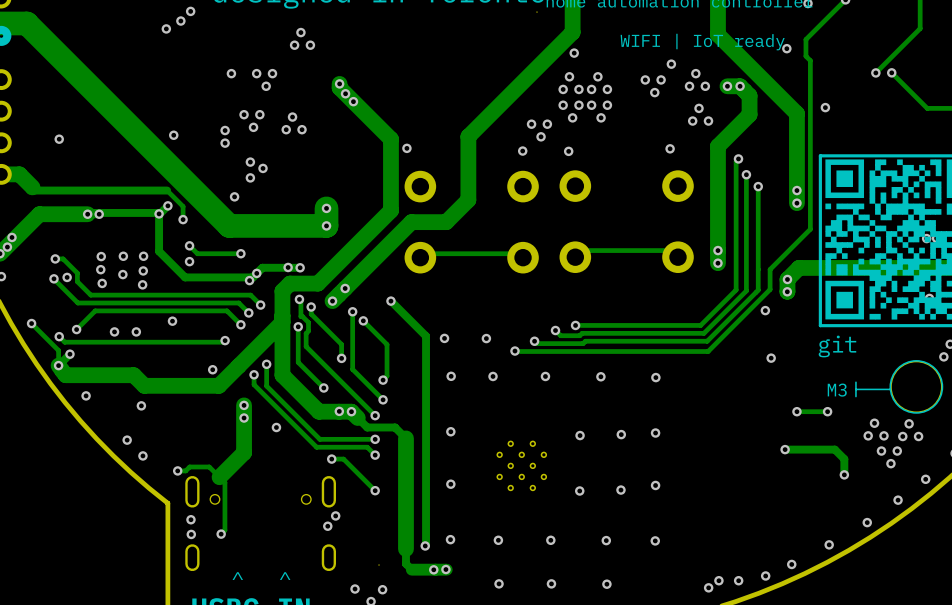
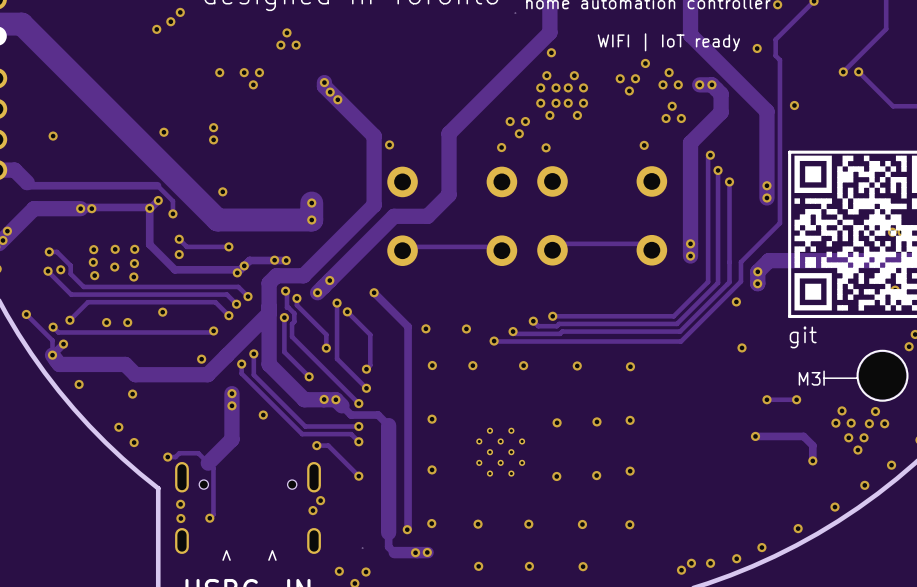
via: (244, 114) -> none
via: (259, 114) -> none
via: (292, 117) -> none
via: (253, 127) -> none
via: (286, 129) -> none
via: (302, 129) -> none
via: (250, 162) -> none
via: (263, 168) -> none
via: (250, 177) -> none

